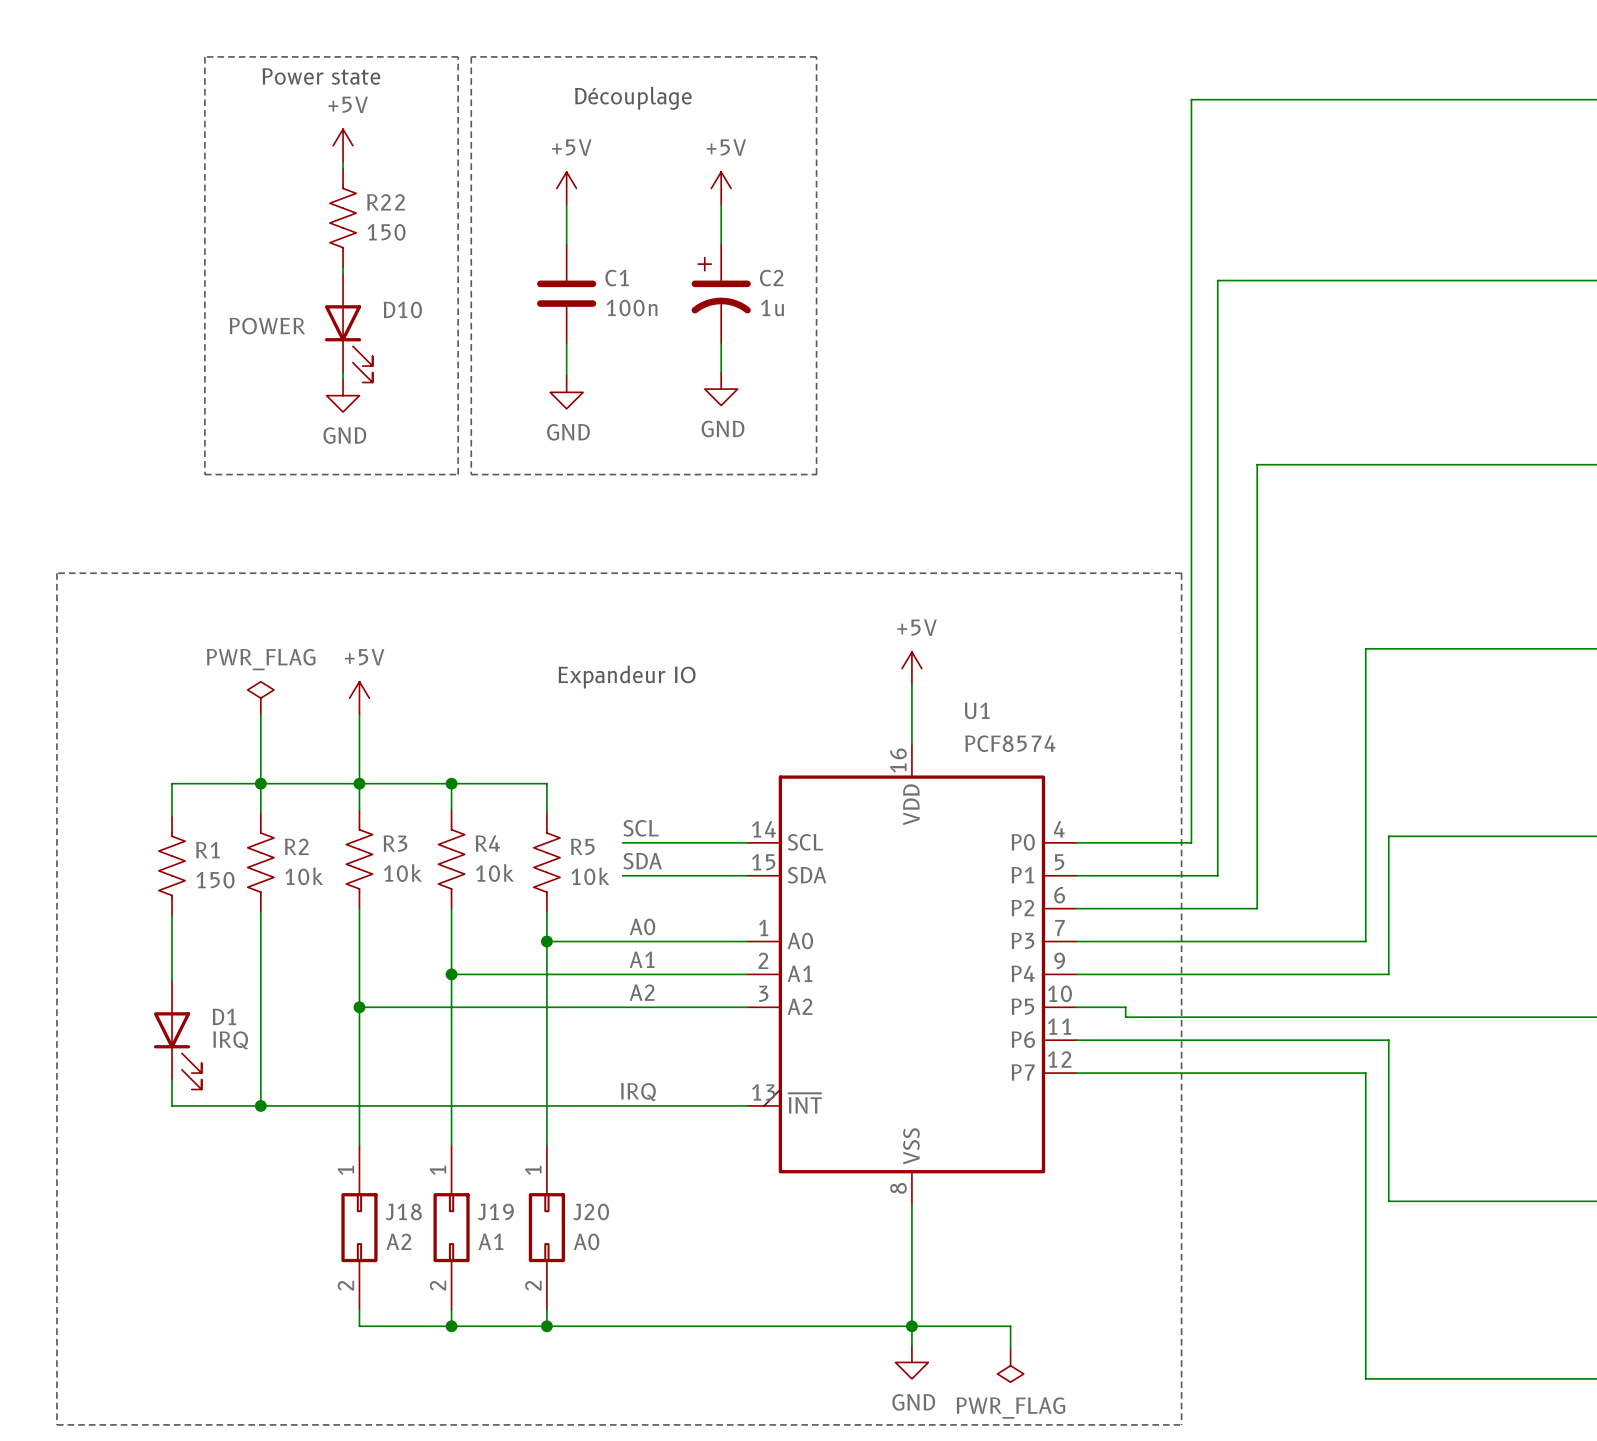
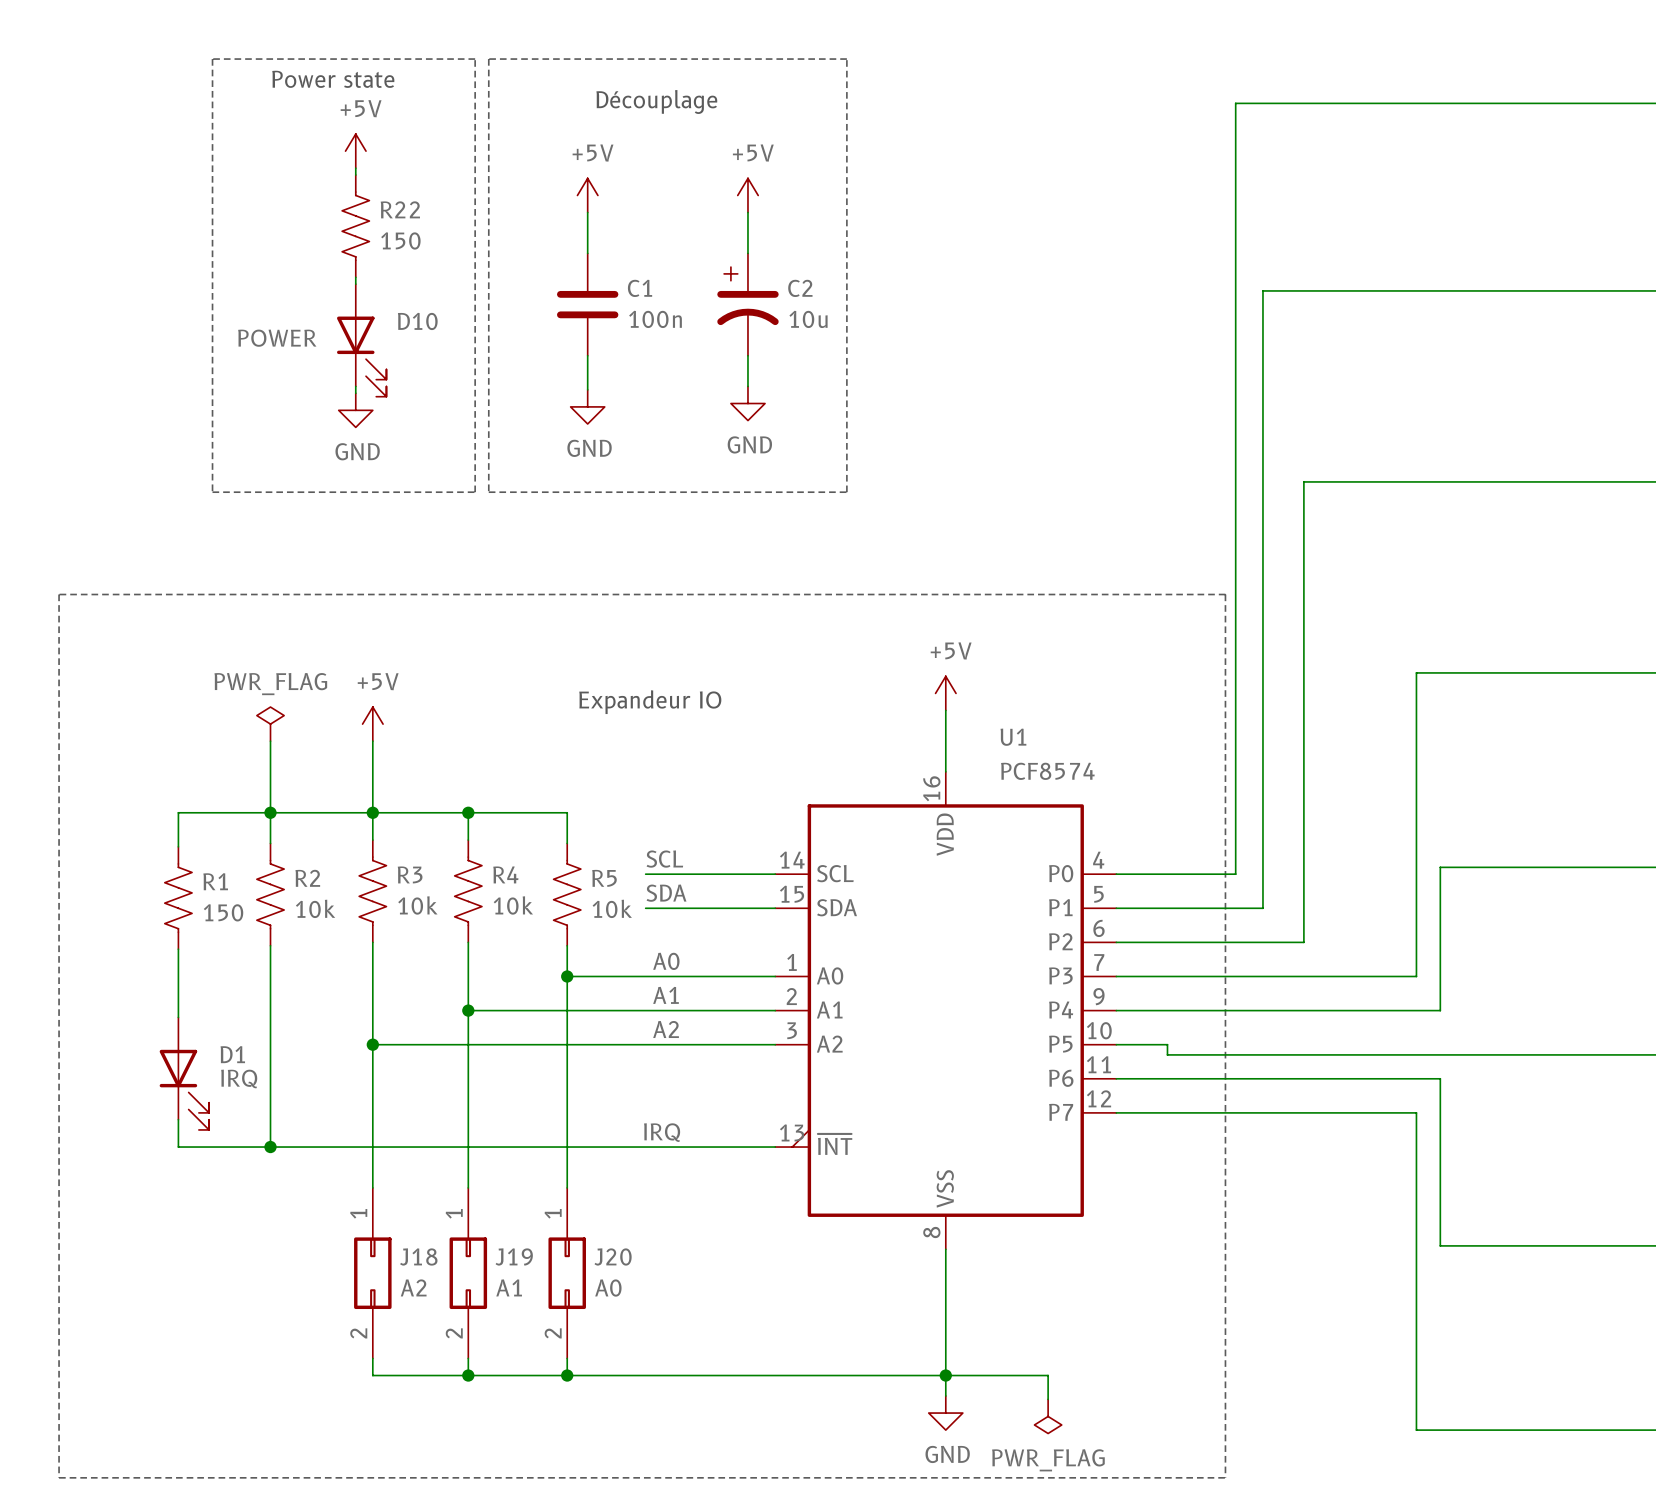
C2 value: 1u (772, 307) -> 10u (808, 319)

